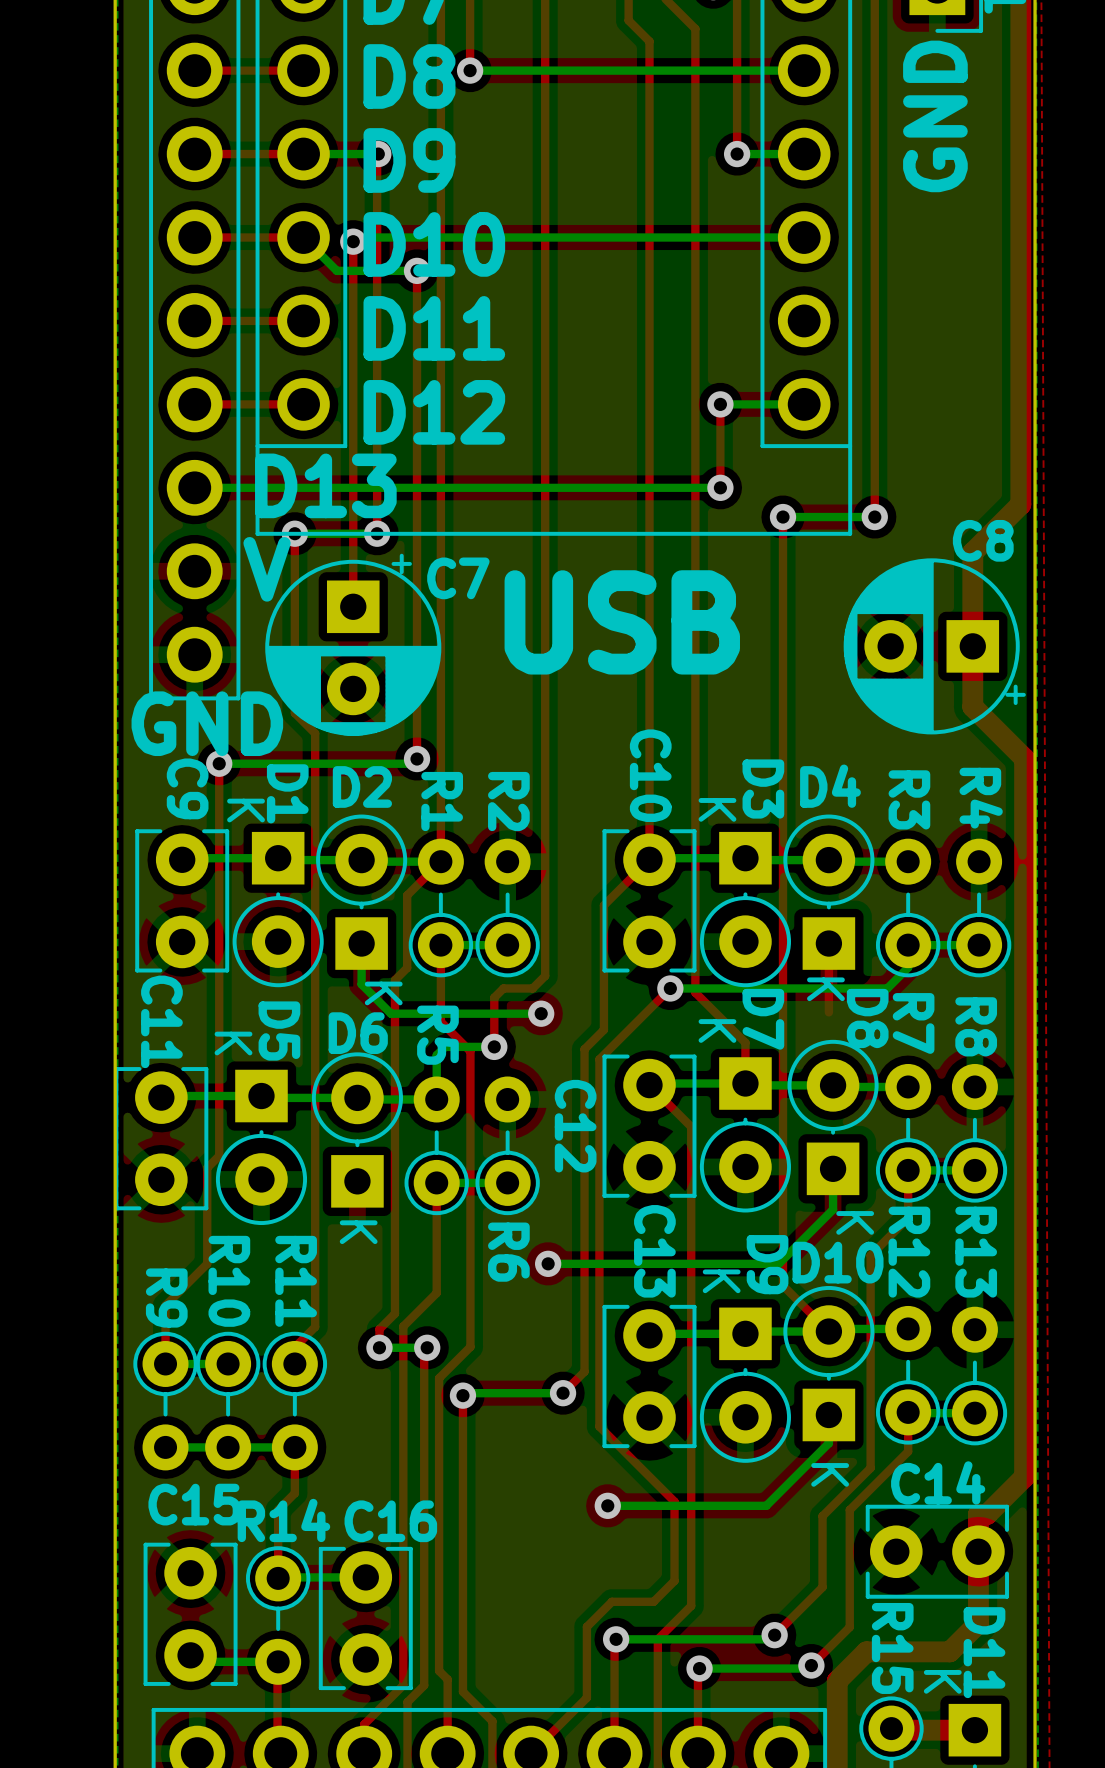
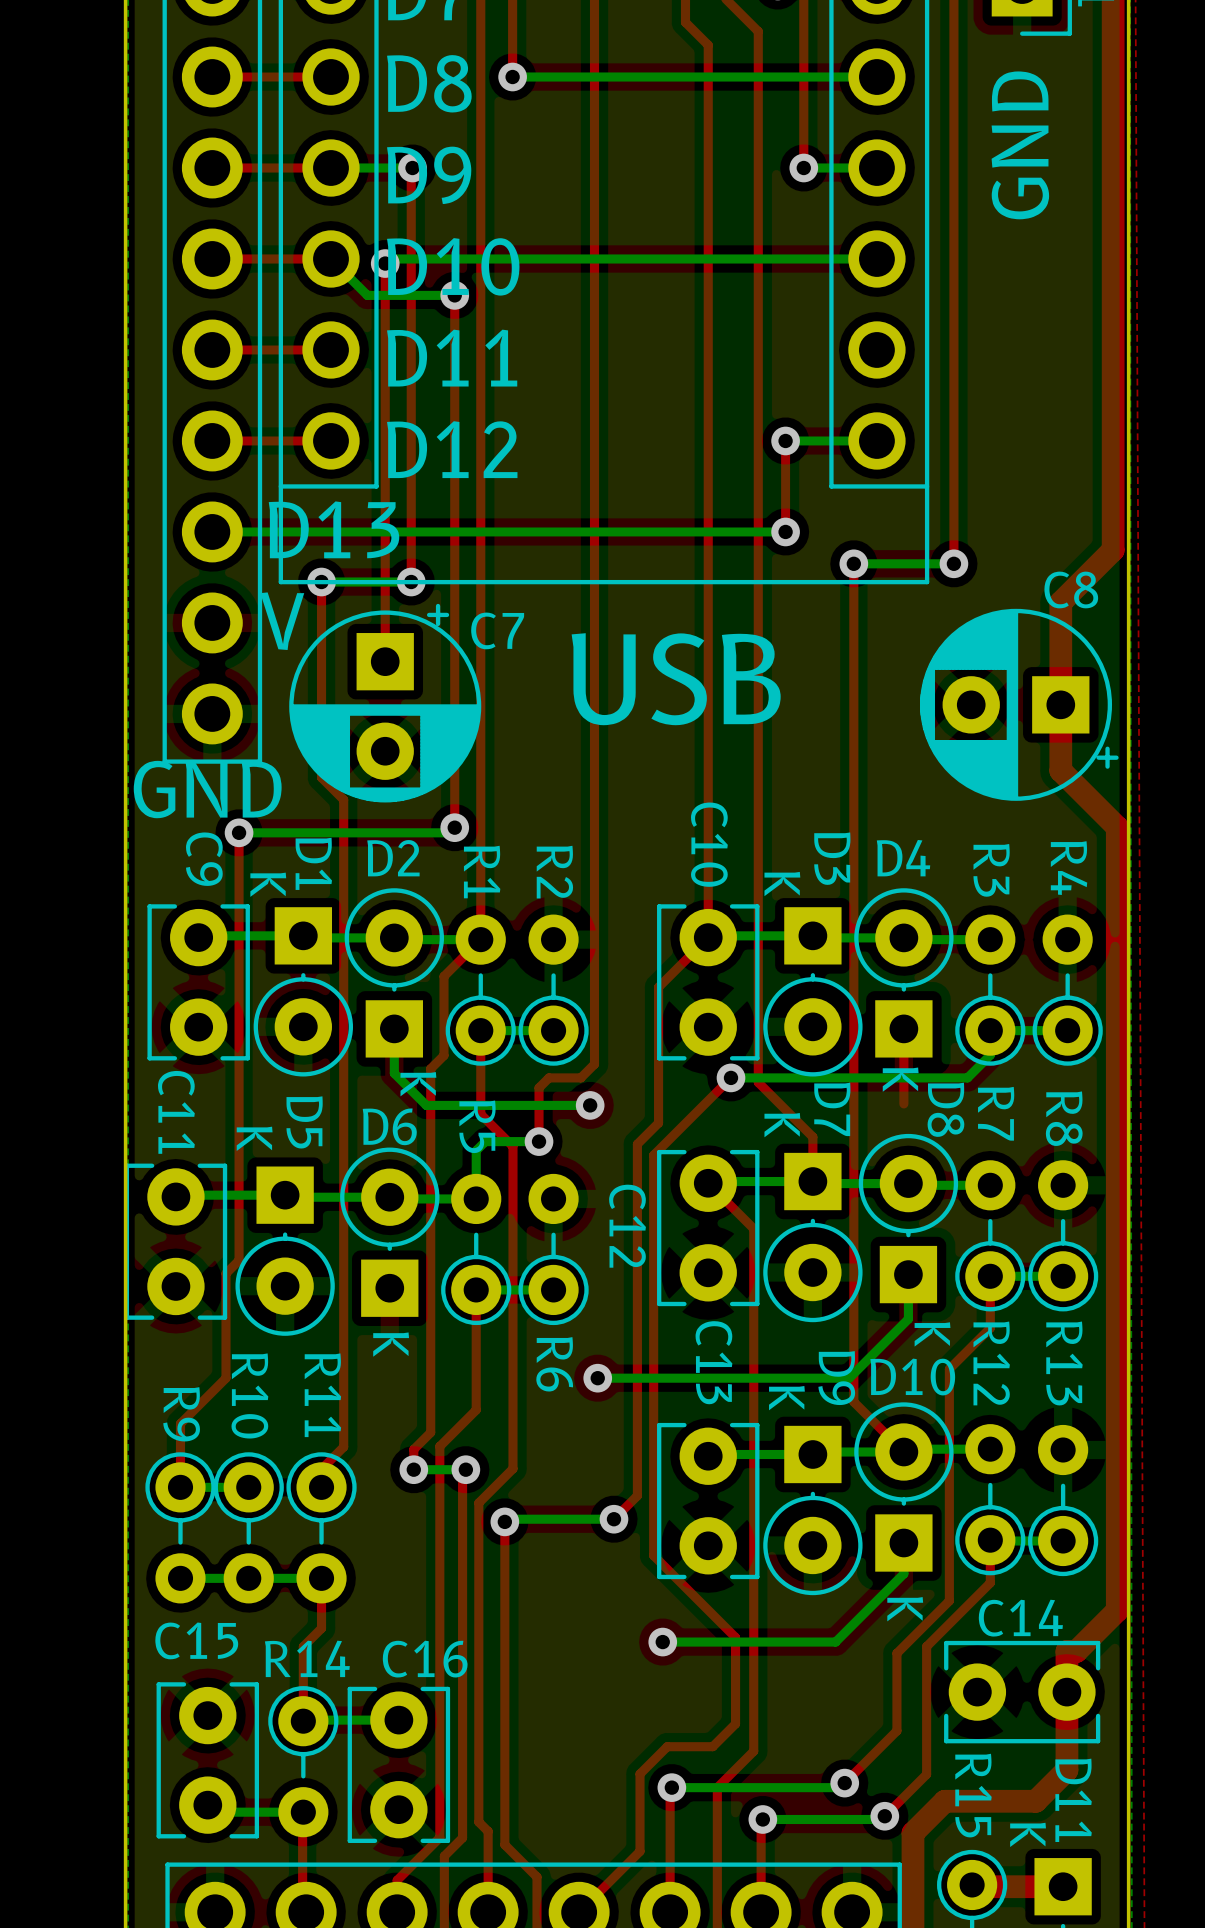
C15 name position: C15 (194, 1504) -> C15 (196, 1640)

